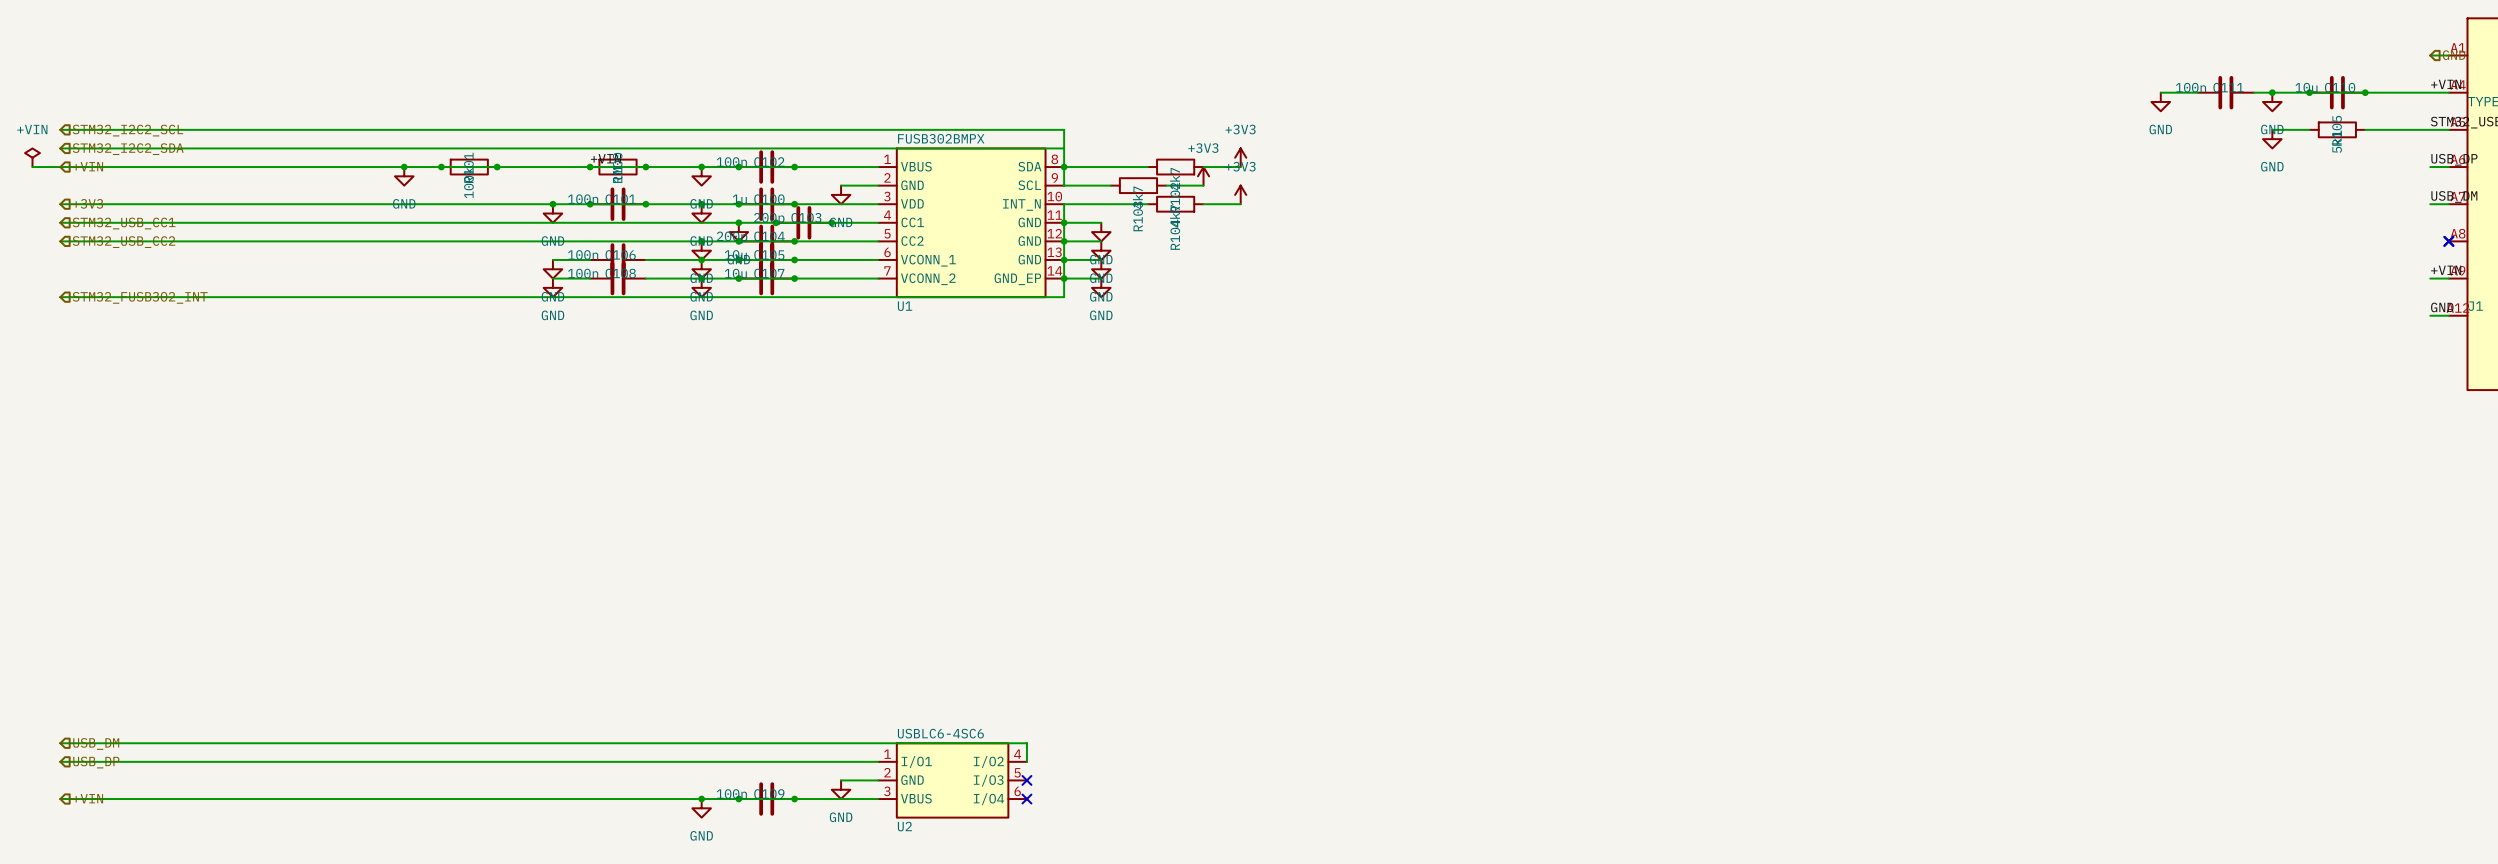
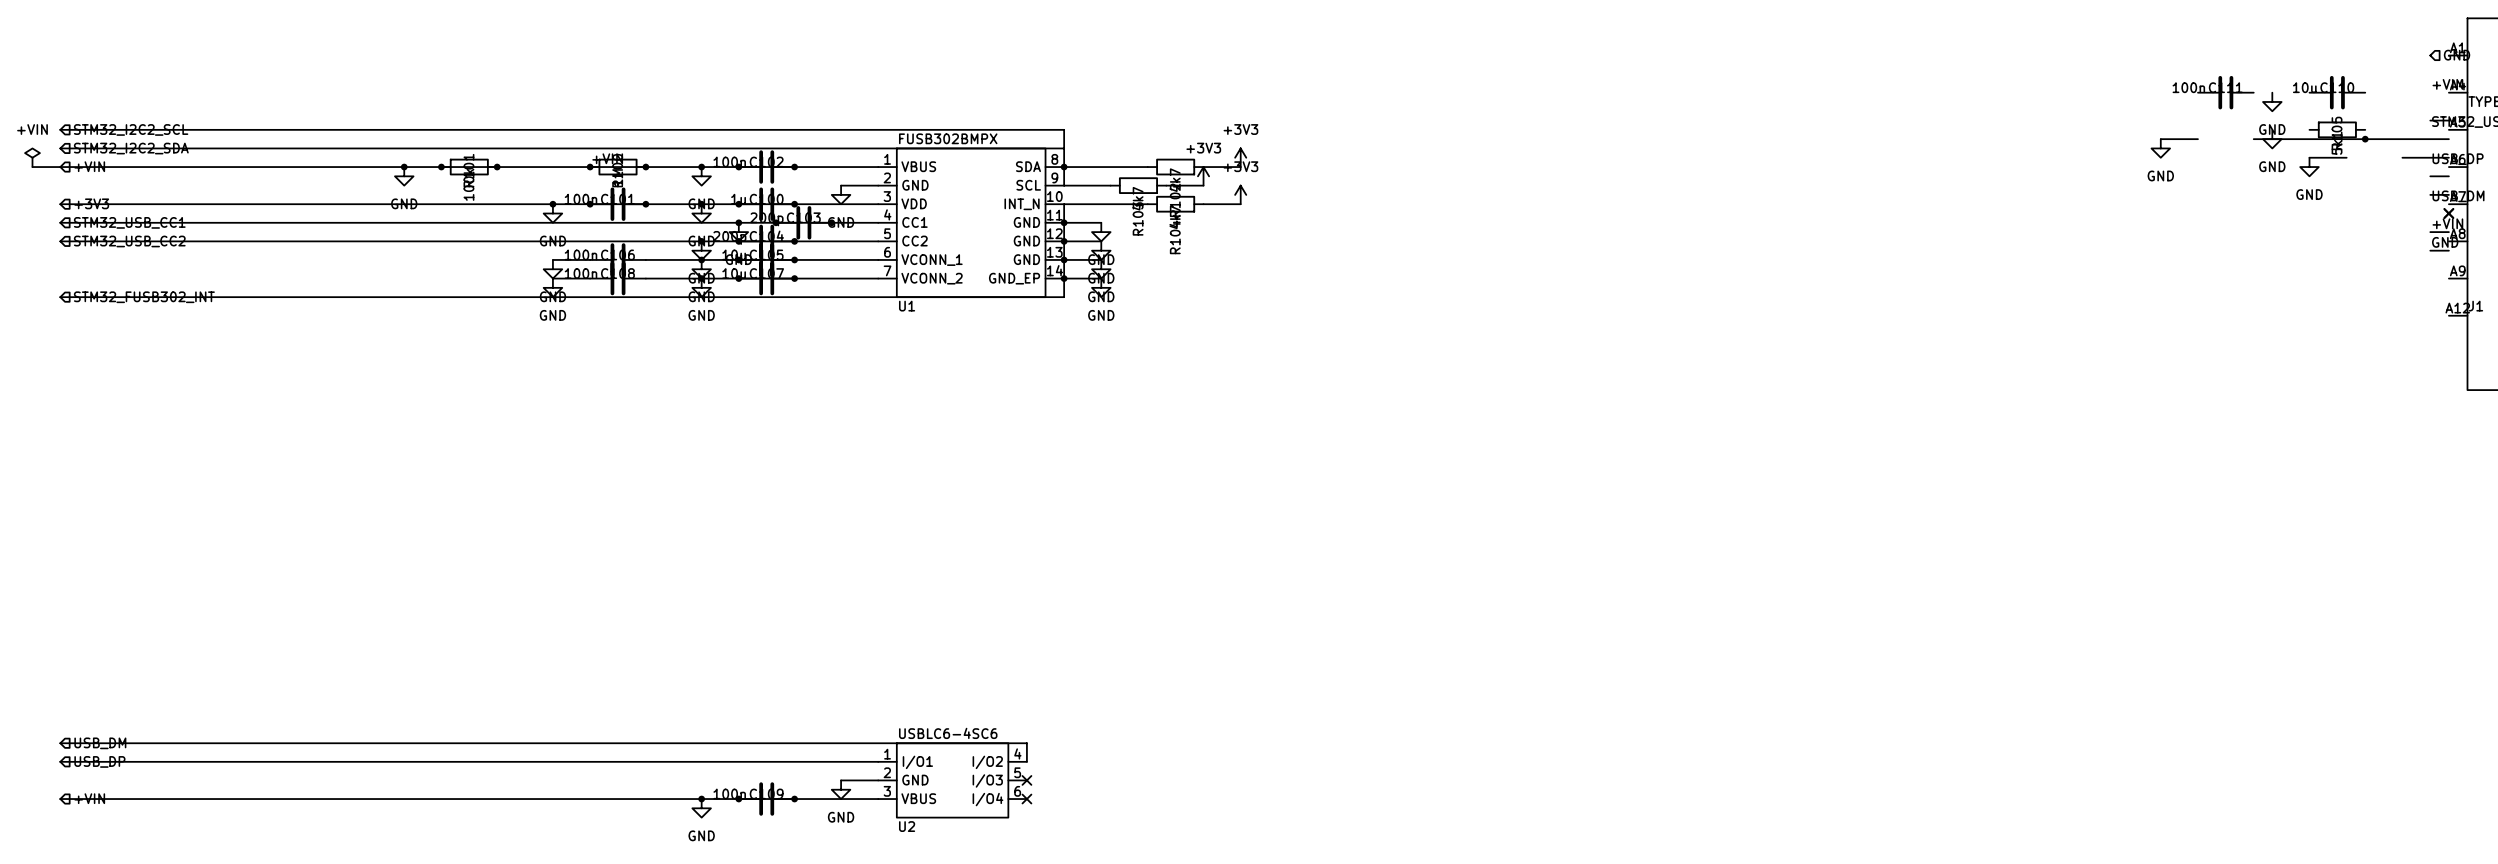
wire: (2430, 55) (2448, 55) -> (2430, 176) (2448, 176)
wire: (2160, 92) (2197, 92) -> (2160, 139) (2197, 139)
wire: (2253, 92) (2448, 92) -> (2253, 139) (2448, 139)
junction: (2272, 92) -> none
junction: (2309, 92) -> none
junction: (2365, 92) -> none
power symbol position: GND (2160, 101) -> GND (2160, 148)
wire: (2272, 129) (2309, 129) -> (2309, 157) (2346, 157)
wire: (2365, 129) (2448, 129) -> none
junction: none -> (2365, 139)
wire: none -> (2402, 157) (2448, 157)
power symbol: none -> GND (2309, 167)
wire: (2430, 167) (2448, 167) -> (2430, 250) (2448, 250)
wire: (2430, 204) (2448, 204) -> (2430, 120) (2448, 120)
no-connect mark position: (2448, 241) -> (2448, 213)
label position: +VIN (2446, 270) -> +VIN (2447, 223)
wire: (2430, 278) (2448, 278) -> (2430, 194) (2448, 194)
label position: GND (2442, 307) -> GND (2445, 242)
wire: (2430, 315) (2448, 315) -> (2430, 232) (2448, 232)

